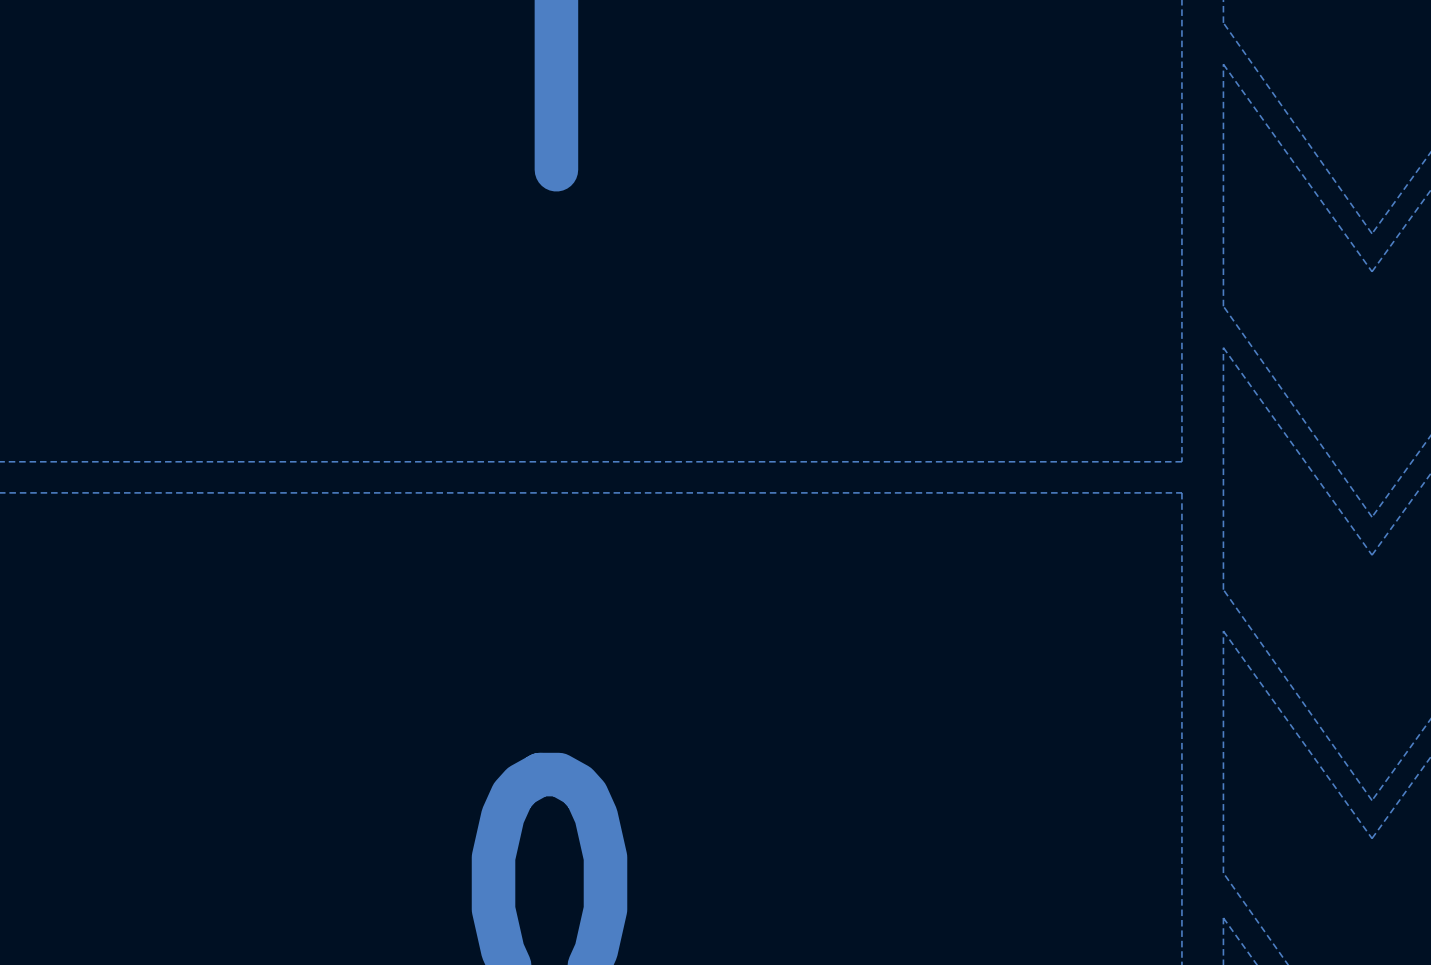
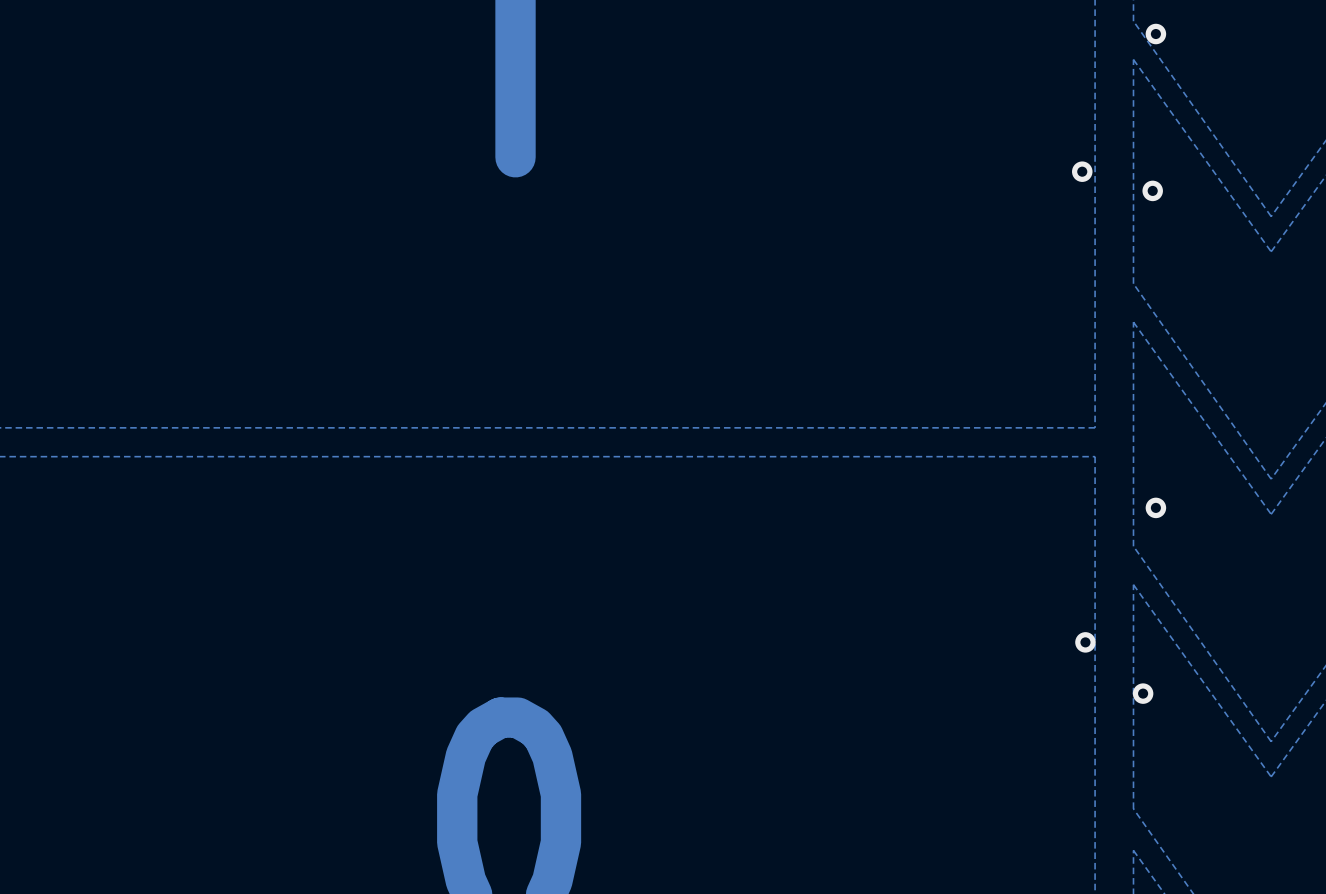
via: none -> (1155, 34)
via: none -> (1082, 171)
via: none -> (1152, 190)
via: none -> (1155, 507)
via: none -> (1085, 642)
via: none -> (1143, 693)

